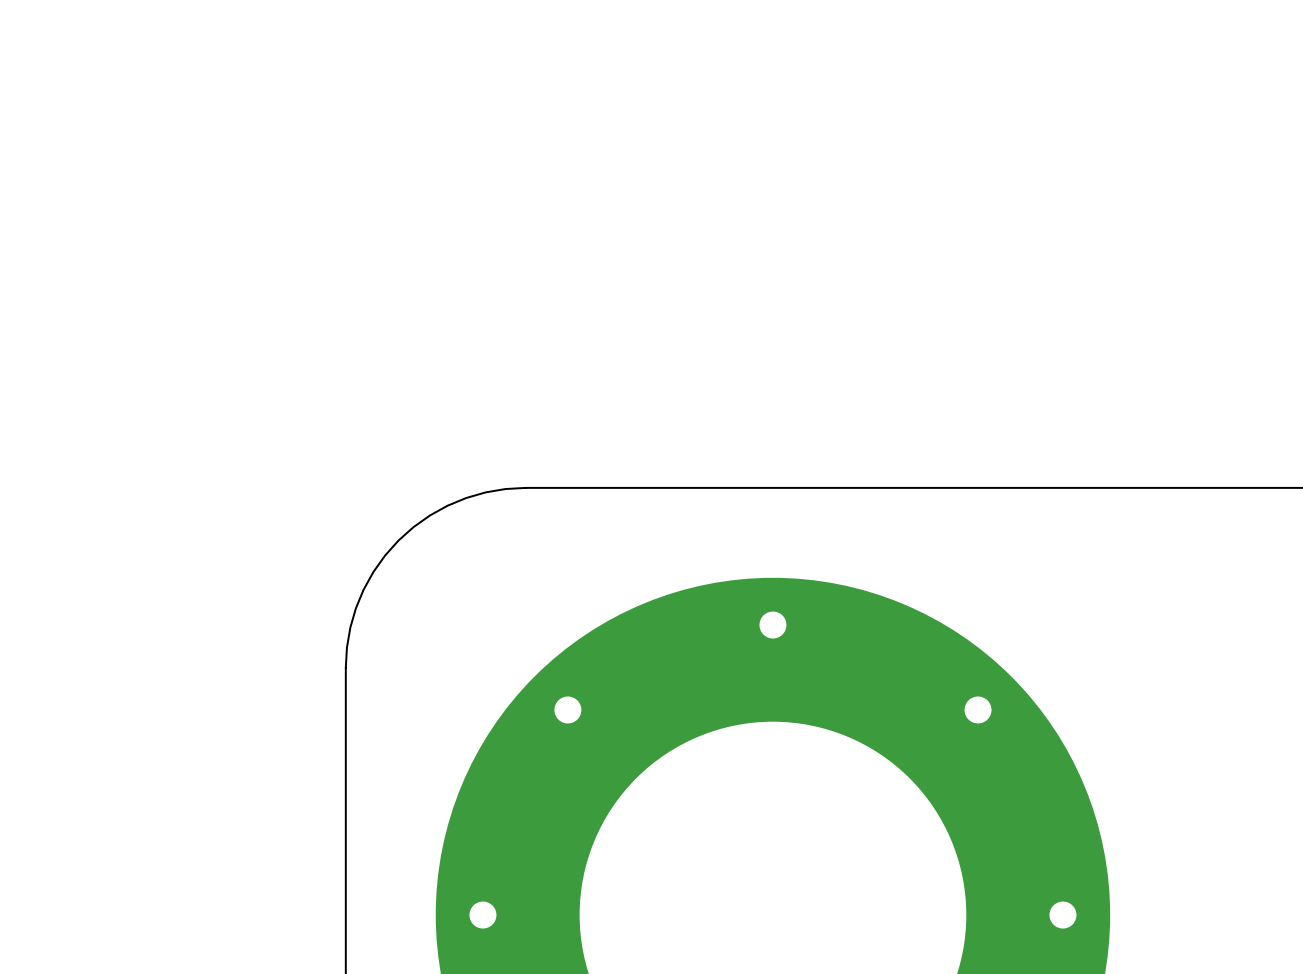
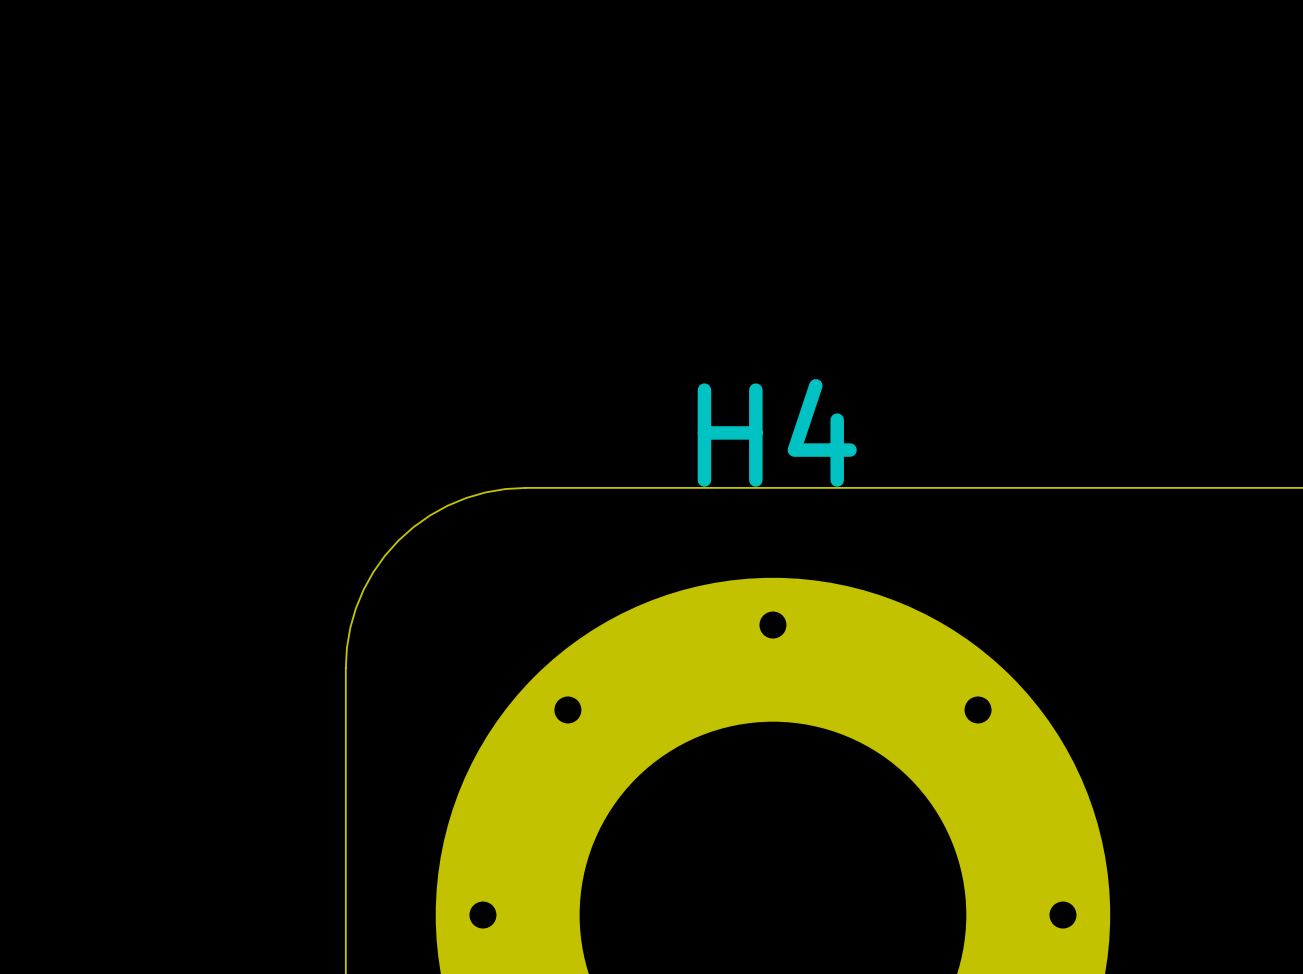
H4 name: none -> H4 (777, 432)

